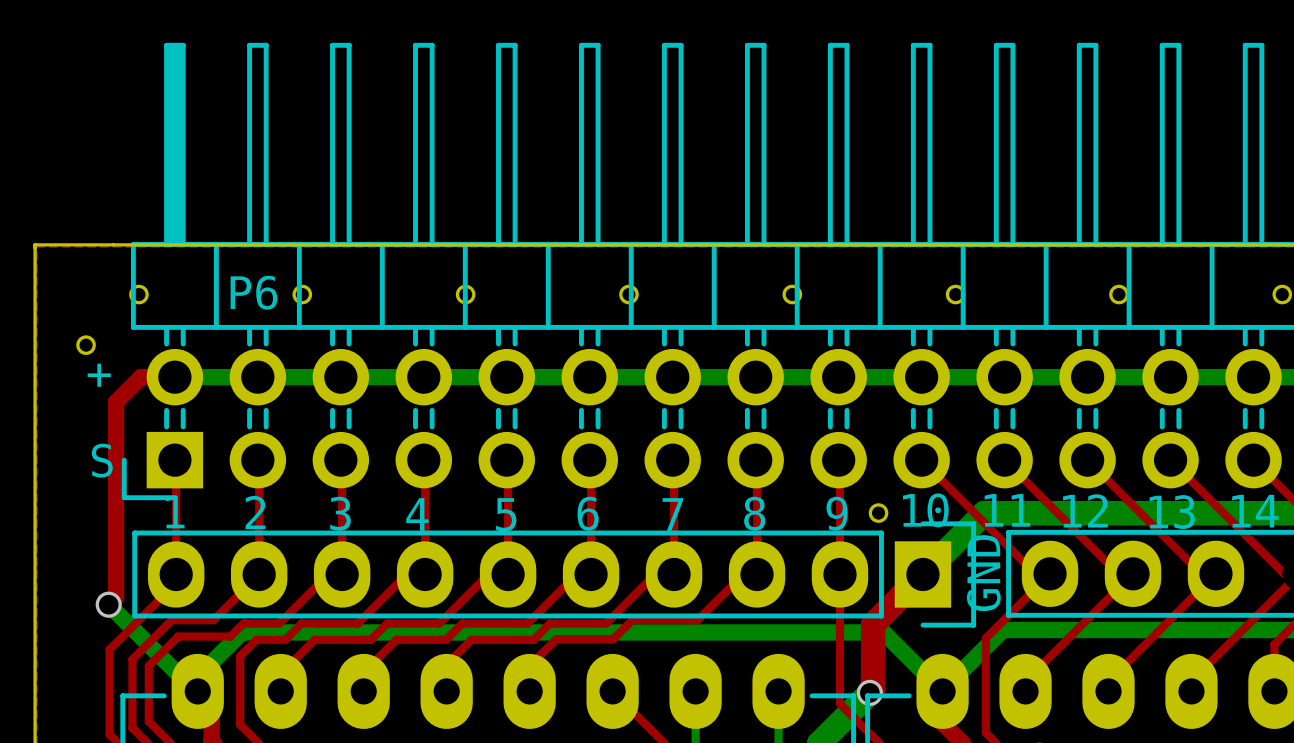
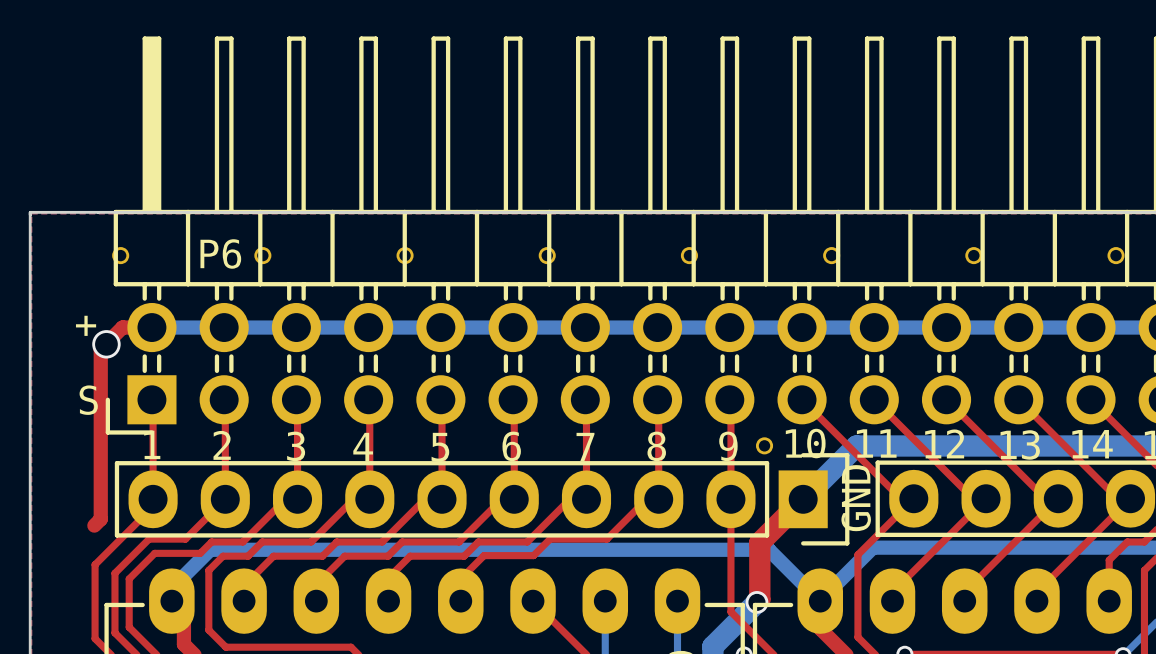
part: (86, 345) -> none
via: none -> (106, 344)
bottom track: (108, 604) (195, 691) -> none
via: (108, 604) -> none

